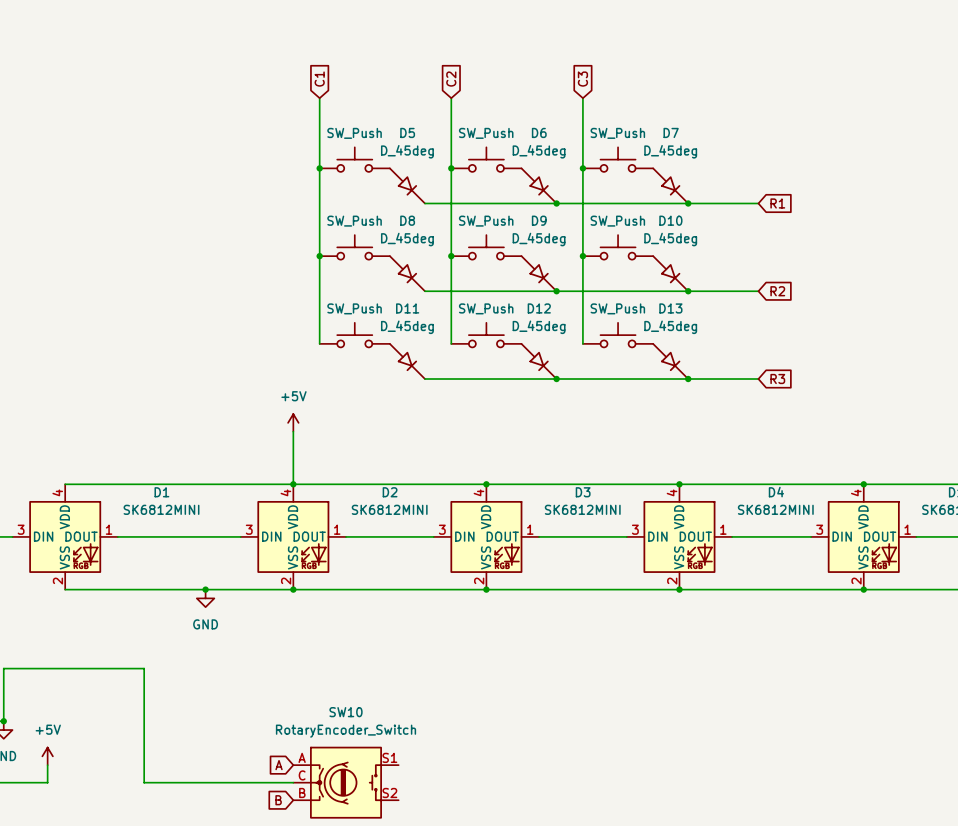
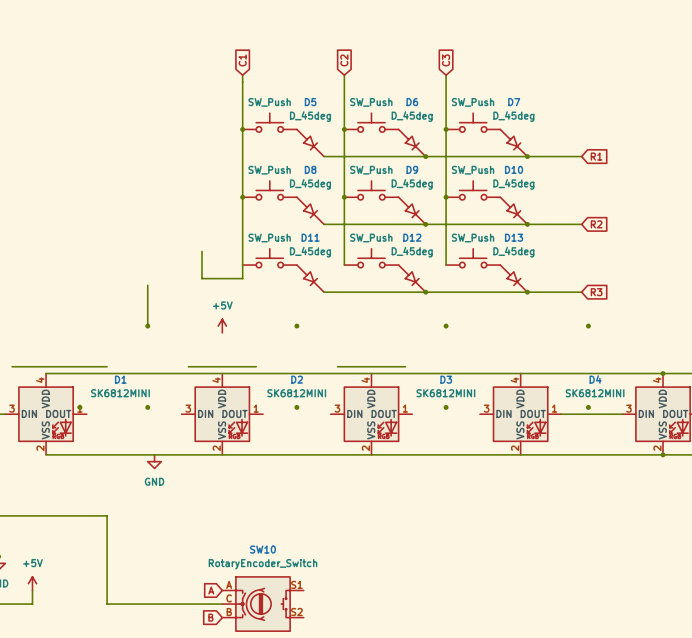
wire: none -> (201, 251) (201, 278) (242, 278) (242, 265)
junction: none -> (147, 326)
junction: none -> (296, 326)
junction: none -> (446, 326)
junction: none -> (588, 326)
wire: (293, 431) (293, 484) -> (147, 285) (147, 326)
junction: (293, 484) -> none
junction: (486, 484) -> none
junction: (679, 484) -> none
junction: none -> (79, 407)
junction: none -> (147, 407)
junction: none -> (296, 407)
junction: none -> (446, 407)
junction: none -> (588, 407)
wire: (117, 536) (240, 536) -> (12, 366) (107, 366)
wire: (346, 536) (433, 536) -> (188, 366) (256, 366)
wire: (539, 536) (626, 536) -> (337, 366) (405, 366)
junction: (205, 589) -> none
junction: (293, 589) -> none
junction: (486, 589) -> none
junction: (679, 589) -> none

